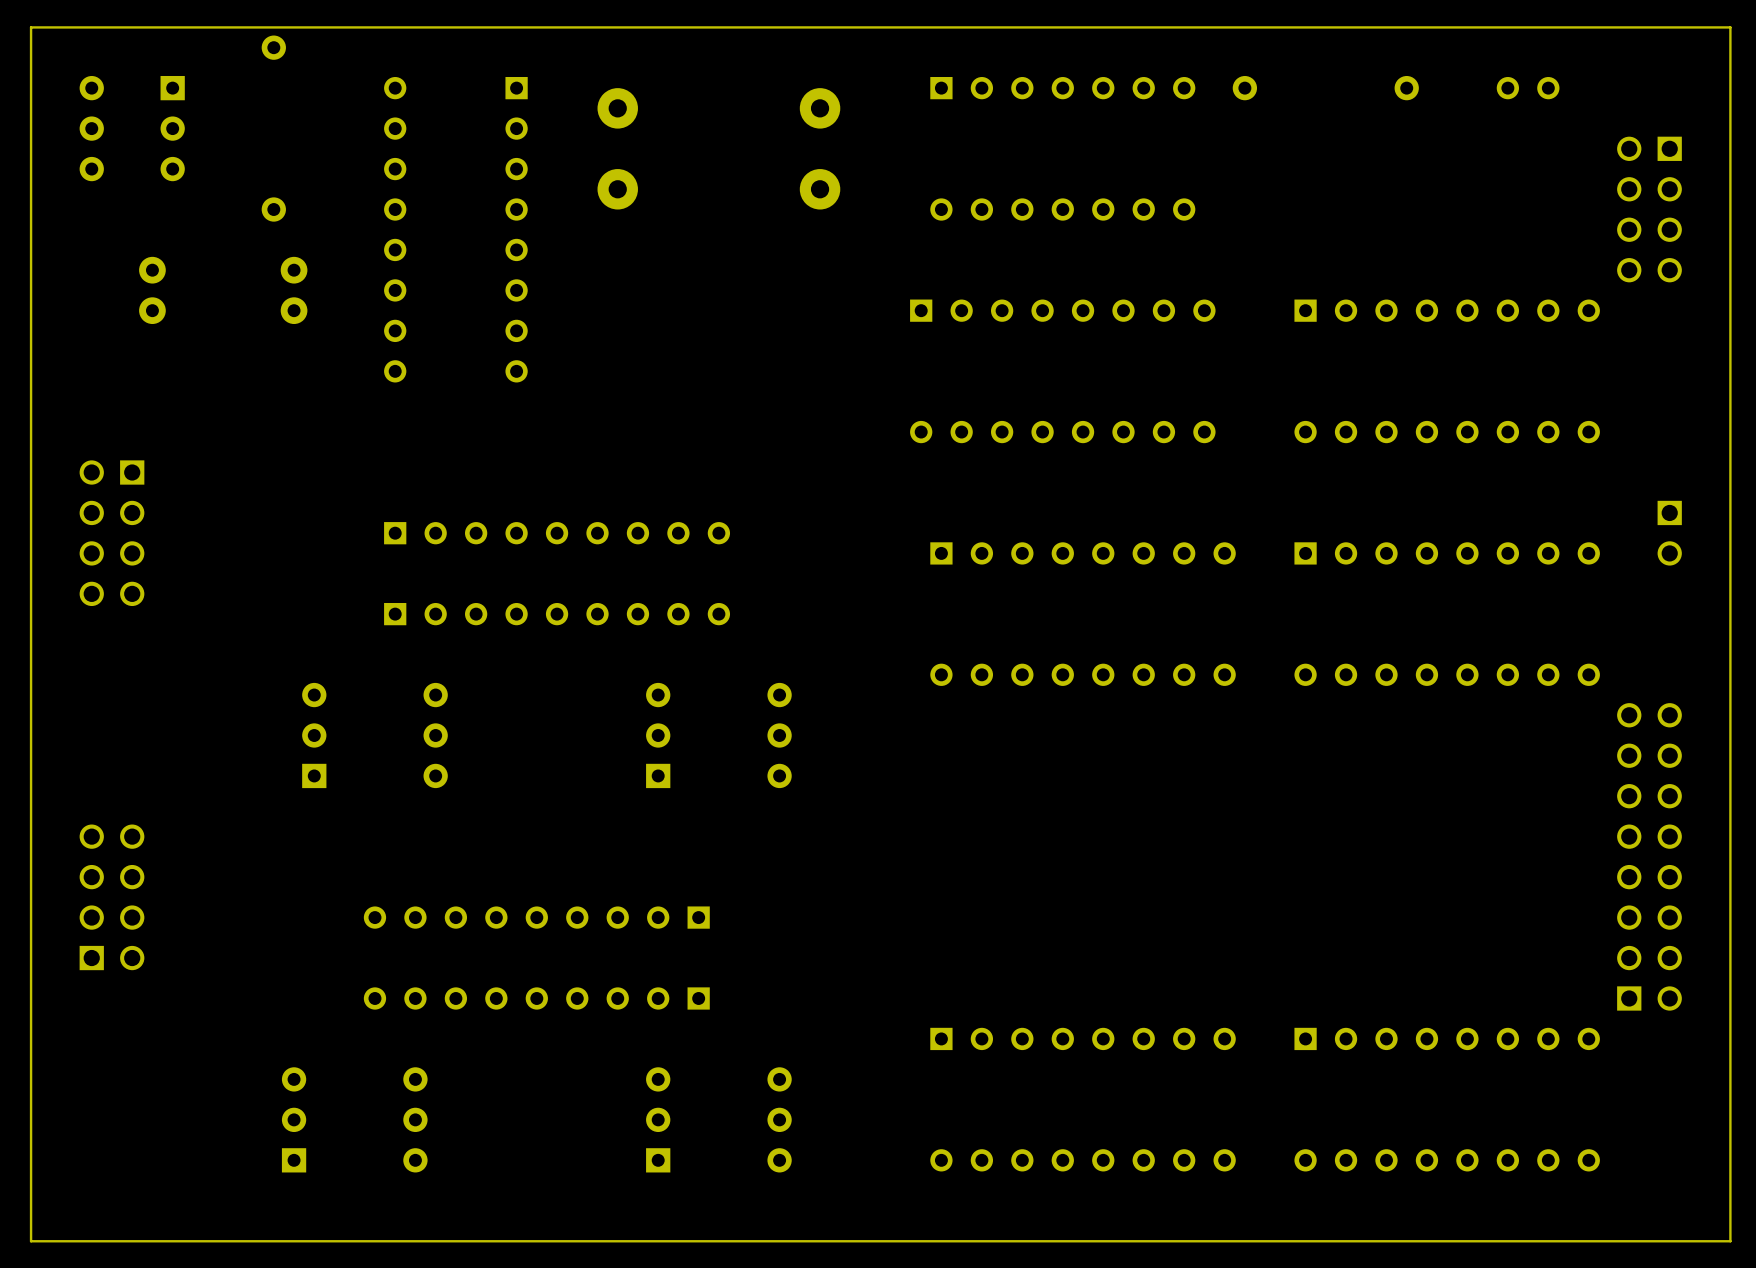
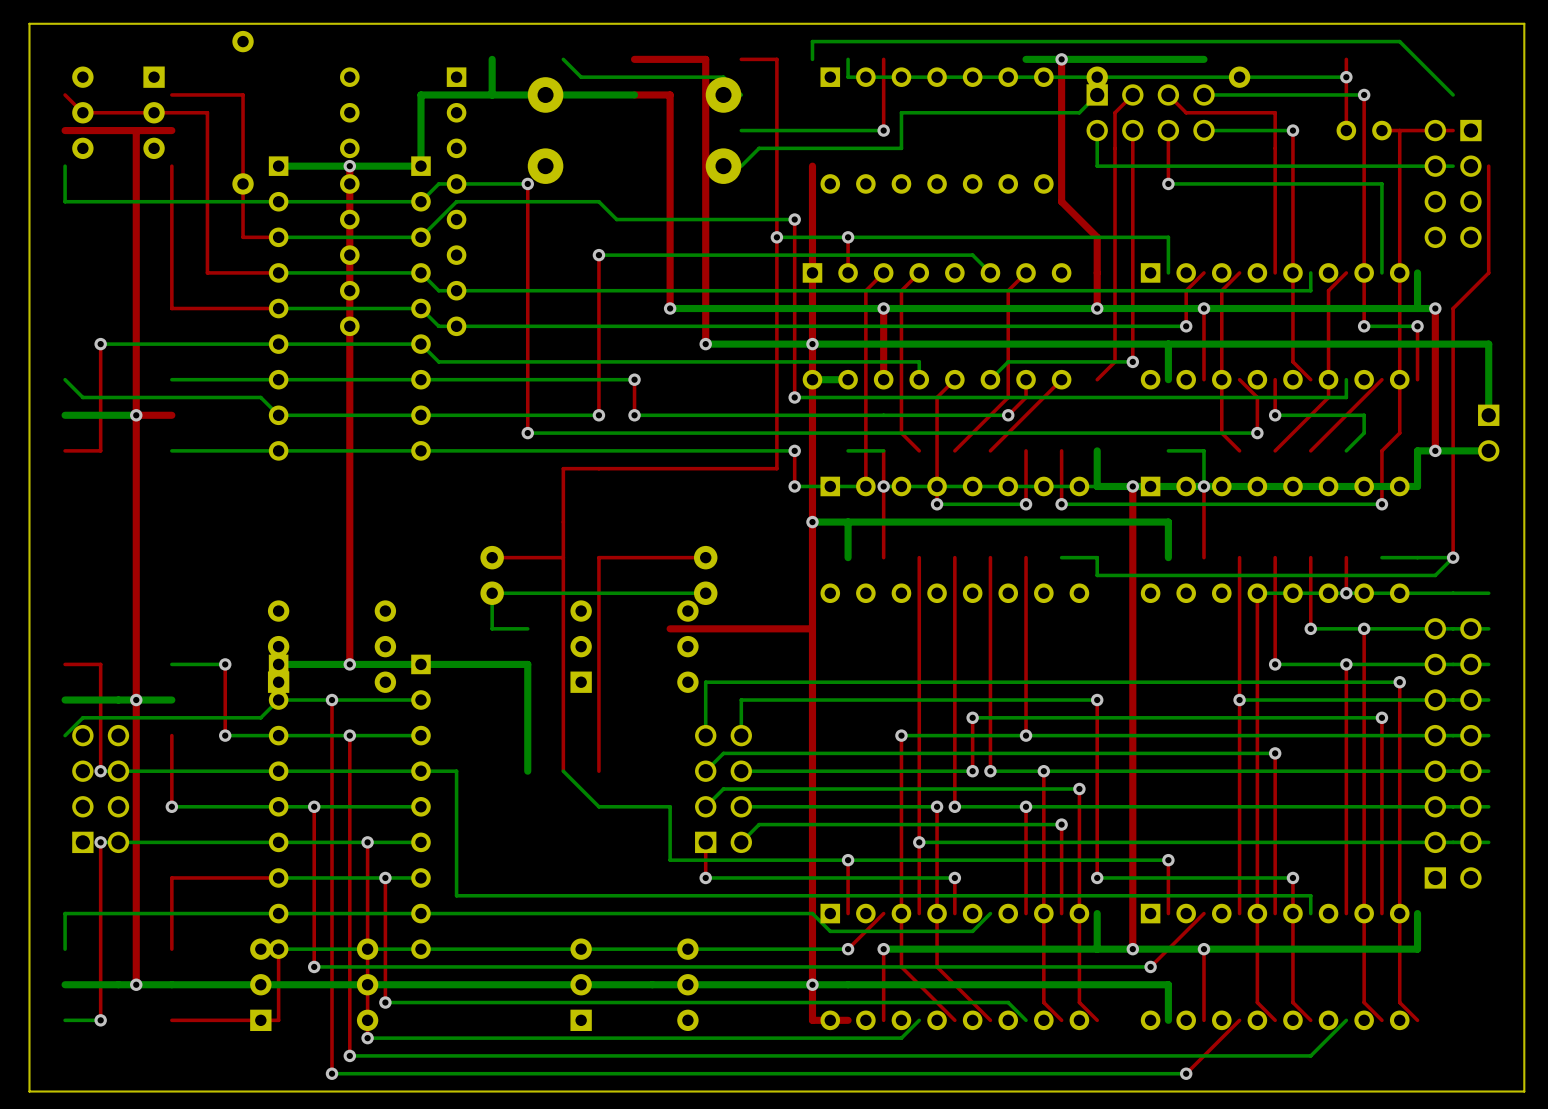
bottom track: none -> (492, 59) (492, 94)
bottom track: none -> (563, 59) (581, 77) (723, 77) (741, 94)
top track: none -> (634, 59) (705, 59) (705, 344)
top track: none -> (741, 59) (776, 59) (776, 468) (563, 468) (563, 771)
bottom track: none -> (812, 59) (812, 41) (1399, 41) (1453, 94)
bottom track: none -> (848, 59) (848, 77) (1346, 77)
top track: none -> (883, 59) (883, 130)
top track: none -> (1061, 59) (1061, 201) (1097, 237) (1097, 308)
via: none -> (1061, 59)
bottom track: none -> (1203, 59) (1026, 59)
top track: none -> (1346, 59) (1346, 130)
part position: (1528, 88) -> (1364, 130)
via: none -> (1346, 77)
top track: none -> (65, 94) (82, 112) (207, 112) (207, 272) (278, 272)
top track: none -> (171, 94) (243, 94) (243, 237) (278, 237)
top track: none -> (634, 94) (670, 94) (670, 308)
bottom track: none -> (634, 94) (420, 94) (420, 166) (278, 166)
bottom track: none -> (1097, 94) (1079, 112) (901, 112) (901, 148) (759, 148) (741, 166)
top track: none -> (1132, 94) (1115, 112) (1115, 361) (1097, 379)
top track: none -> (1168, 94) (1186, 112) (1275, 112) (1275, 272)
top track: none -> (1364, 94) (1364, 326)
bottom track: none -> (1364, 94) (1203, 94)
via: none -> (1364, 94)
part: none -> (1150, 112)
top track: none -> (136, 130) (136, 984)
top track: none -> (171, 130) (65, 130)
bottom track: none -> (883, 130) (741, 130)
via: none -> (883, 130)
bottom track: none -> (1097, 130) (1097, 166) (1453, 166)
top track: none -> (1132, 130) (1132, 361)
top track: none -> (1168, 130) (1168, 183)
top track: none -> (1292, 130) (1292, 361) (1310, 379)
bottom track: none -> (1292, 130) (1203, 130)
via: none -> (1292, 130)
top track: none -> (1399, 130) (1399, 433) (1381, 450) (1381, 504)
top track: none -> (1453, 130) (1381, 130)
bottom track: none -> (65, 166) (65, 201) (420, 201) (438, 183) (527, 183)
top track: none -> (171, 166) (171, 308) (278, 308)
top track: none -> (349, 166) (349, 664)
via: none -> (349, 166)
top track: none -> (812, 166) (812, 1020) (848, 1020)
top track: none -> (1488, 166) (1488, 272) (1453, 308) (1453, 557)
top track: none -> (527, 183) (527, 433)
via: none -> (527, 183)
bottom track: none -> (1168, 183) (1381, 183) (1381, 272)
via: none -> (1168, 183)
top track: none -> (794, 219) (794, 397)
bottom track: none -> (794, 219) (616, 219) (598, 201) (456, 201) (420, 237) (278, 237)
via: none -> (794, 219)
bottom track: none -> (776, 237) (1168, 237) (1168, 272)
via: none -> (776, 237)
top track: none -> (848, 237) (848, 272)
via: none -> (848, 237)
part: (152, 290) -> none
part: (294, 290) -> none
top track: none -> (598, 255) (598, 415)
bottom track: none -> (598, 255) (972, 255) (990, 272)
via: none -> (598, 255)
top track: none -> (883, 272) (865, 290) (865, 486)
top track: none -> (919, 272) (901, 290) (901, 433) (919, 450)
top track: none -> (1026, 272) (1008, 290) (1008, 397) (954, 450)
top track: none -> (1203, 272) (1186, 290) (1186, 326)
top track: none -> (1239, 272) (1221, 290) (1221, 433) (1239, 450)
bottom track: none -> (1310, 272) (1310, 290) (438, 290) (420, 272) (278, 272)
top track: none -> (1346, 272) (1328, 290) (1328, 397) (1275, 450)
bottom track: none -> (1417, 272) (1417, 308)
bottom track: none -> (278, 308) (420, 308) (438, 326) (1186, 326)
part: none -> (278, 308)
part: none -> (420, 308)
via: none -> (670, 308)
top track: none -> (883, 308) (883, 379)
via: none -> (883, 308)
via: none -> (1097, 308)
top track: none -> (1203, 308) (1203, 379)
via: none -> (1203, 308)
top track: none -> (1435, 308) (1435, 450)
bottom track: none -> (1435, 308) (670, 308)
via: none -> (1435, 308)
via: none -> (1186, 326)
via: none -> (1364, 326)
top track: none -> (1417, 326) (1417, 379)
bottom track: none -> (1417, 326) (1364, 326)
via: none -> (1417, 326)
top track: none -> (100, 344) (100, 450) (65, 450)
bottom track: none -> (100, 344) (420, 344) (438, 361) (919, 361) (919, 379)
via: none -> (100, 344)
bottom track: none -> (705, 344) (1488, 344) (1488, 415)
via: none -> (705, 344)
via: none -> (812, 344)
bottom track: none -> (1168, 344) (1168, 379)
bottom track: none -> (1132, 361) (1008, 361) (990, 379)
via: none -> (1132, 361)
bottom track: none -> (65, 379) (82, 397) (260, 397) (278, 415) (598, 415)
top track: none -> (634, 379) (634, 415)
bottom track: none -> (634, 379) (171, 379)
via: none -> (634, 379)
bottom track: none -> (848, 379) (812, 379)
top track: none -> (954, 379) (937, 397) (937, 504)
top track: none -> (1026, 379) (1026, 397) (1008, 415)
top track: none -> (1061, 379) (990, 450)
top track: none -> (1239, 379) (1257, 397) (1257, 433)
top track: none -> (1275, 379) (1275, 415)
bottom track: none -> (1346, 379) (1346, 397) (794, 397)
top track: none -> (1381, 379) (1310, 450)
via: none -> (794, 397)
bottom track: none -> (136, 415) (65, 415)
via: none -> (136, 415)
top track: none -> (171, 415) (136, 415)
via: none -> (598, 415)
via: none -> (634, 415)
bottom track: none -> (1008, 415) (634, 415)
via: none -> (1008, 415)
bottom track: none -> (1275, 415) (1364, 415) (1364, 433) (1346, 450)
via: none -> (1275, 415)
via: none -> (527, 433)
bottom track: none -> (1257, 433) (527, 433)
via: none -> (1257, 433)
top track: none -> (794, 450) (794, 486)
bottom track: none -> (794, 450) (171, 450)
via: none -> (794, 450)
top track: none -> (883, 450) (883, 557)
bottom track: none -> (883, 450) (848, 450)
top track: none -> (1026, 450) (1026, 504)
top track: none -> (1061, 450) (1061, 504)
bottom track: none -> (1097, 450) (1097, 486)
bottom track: none -> (1168, 450) (1203, 450) (1203, 486)
via: none -> (1435, 450)
bottom track: none -> (1488, 450) (1417, 450) (1417, 486) (1097, 486)
part: (111, 533) -> none
part: (557, 533) -> none
part position: (1669, 533) -> (1488, 433)
via: none -> (794, 486)
bottom track: none -> (865, 486) (794, 486)
via: none -> (883, 486)
bottom track: none -> (1097, 486) (883, 486)
top track: none -> (1132, 486) (1132, 949)
via: none -> (1132, 486)
top track: none -> (1203, 486) (1203, 557)
via: none -> (1203, 486)
via: none -> (937, 504)
bottom track: none -> (1026, 504) (937, 504)
via: none -> (1026, 504)
via: none -> (1061, 504)
bottom track: none -> (1381, 504) (1061, 504)
via: none -> (1381, 504)
bottom track: none -> (812, 522) (1168, 522) (1168, 557)
via: none -> (812, 522)
bottom track: none -> (848, 522) (848, 557)
part: (557, 614) -> none
top track: none -> (563, 557) (492, 557)
top track: none -> (705, 557) (598, 557) (598, 771)
top track: none -> (919, 557) (919, 913)
top track: none -> (954, 557) (954, 806)
top track: none -> (990, 557) (990, 771)
top track: none -> (1026, 557) (1026, 735)
top track: none -> (1239, 557) (1239, 913)
top track: none -> (1275, 557) (1275, 664)
top track: none -> (1310, 557) (1310, 628)
top track: none -> (1346, 557) (1346, 593)
bottom track: none -> (1381, 557) (1453, 557) (1435, 575) (1097, 575) (1097, 557) (1061, 557)
via: none -> (1453, 557)
part: none -> (492, 575)
part: none -> (705, 575)
bottom track: none -> (705, 593) (492, 593) (492, 628) (527, 628)
top track: none -> (1257, 593) (1257, 1002) (1275, 1020)
via: none -> (1346, 593)
bottom track: none -> (1488, 593) (1257, 593)
top track: none -> (812, 628) (670, 628)
via: none -> (1310, 628)
top track: none -> (1364, 628) (1364, 1002) (1381, 1020)
via: none -> (1364, 628)
bottom track: none -> (1488, 628) (1310, 628)
top track: none -> (65, 664) (100, 664) (100, 771)
top track: none -> (225, 664) (225, 735)
bottom track: none -> (225, 664) (171, 664)
via: none -> (225, 664)
bottom track: none -> (278, 664) (527, 664) (527, 771)
via: none -> (349, 664)
via: none -> (1275, 664)
top track: none -> (1346, 664) (1346, 913)
via: none -> (1346, 664)
bottom track: none -> (1488, 664) (1275, 664)
top track: none -> (1399, 682) (1399, 1002) (1417, 1020)
bottom track: none -> (1399, 682) (705, 682) (705, 735)
via: none -> (1399, 682)
via: none -> (136, 700)
bottom track: none -> (171, 700) (65, 700)
top track: none -> (332, 700) (332, 1073)
via: none -> (332, 700)
bottom track: none -> (420, 700) (278, 700) (260, 717) (82, 717) (65, 735)
top track: none -> (1097, 700) (1097, 877)
bottom track: none -> (1097, 700) (741, 700) (741, 735)
via: none -> (1097, 700)
via: none -> (1239, 700)
bottom track: none -> (1488, 700) (1239, 700)
top track: none -> (972, 717) (972, 771)
via: none -> (972, 717)
top track: none -> (1381, 717) (1381, 913)
bottom track: none -> (1381, 717) (972, 717)
via: none -> (1381, 717)
top track: none -> (171, 735) (171, 806)
via: none -> (225, 735)
top track: none -> (349, 735) (349, 1055)
via: none -> (349, 735)
bottom track: none -> (420, 735) (225, 735)
top track: none -> (901, 735) (901, 966) (954, 1020)
via: none -> (901, 735)
via: none -> (1026, 735)
bottom track: none -> (1488, 735) (901, 735)
top track: none -> (1275, 753) (1275, 913)
bottom track: none -> (1275, 753) (723, 753) (705, 771)
via: none -> (1275, 753)
bottom track: none -> (100, 771) (456, 771) (456, 895) (1310, 895) (1310, 913)
via: none -> (100, 771)
bottom track: none -> (563, 771) (598, 806) (670, 806) (670, 860) (1168, 860)
bottom track: none -> (972, 771) (741, 771)
via: none -> (972, 771)
via: none -> (990, 771)
top track: none -> (1043, 771) (1043, 1002) (1061, 1020)
via: none -> (1043, 771)
bottom track: none -> (1488, 771) (990, 771)
part: none -> (723, 788)
top track: none -> (1079, 788) (1079, 1002) (1097, 1020)
bottom track: none -> (1079, 788) (723, 788) (705, 806)
via: none -> (1079, 788)
via: none -> (171, 806)
part: none -> (278, 806)
top track: none -> (314, 806) (314, 966)
via: none -> (314, 806)
bottom track: none -> (420, 806) (171, 806)
part: none -> (420, 806)
part: (536, 917) -> none
top track: none -> (937, 806) (937, 966) (990, 1020)
bottom track: none -> (937, 806) (741, 806)
via: none -> (937, 806)
via: none -> (954, 806)
top track: none -> (1026, 806) (1026, 913)
via: none -> (1026, 806)
bottom track: none -> (1488, 806) (954, 806)
top track: none -> (1061, 824) (1061, 913)
bottom track: none -> (1061, 824) (759, 824) (741, 842)
via: none -> (1061, 824)
top track: none -> (100, 842) (100, 1020)
via: none -> (100, 842)
top track: none -> (367, 842) (367, 1038)
via: none -> (367, 842)
bottom track: none -> (420, 842) (100, 842)
top track: none -> (705, 842) (705, 877)
via: none -> (919, 842)
bottom track: none -> (1488, 842) (919, 842)
top track: none -> (848, 860) (848, 913)
via: none -> (848, 860)
top track: none -> (1168, 860) (1168, 913)
via: none -> (1168, 860)
top track: none -> (278, 877) (171, 877) (171, 949)
top track: none -> (385, 877) (385, 1002)
via: none -> (385, 877)
bottom track: none -> (420, 877) (278, 877)
part: (536, 998) -> none
via: none -> (705, 877)
top track: none -> (954, 877) (954, 913)
bottom track: none -> (954, 877) (705, 877)
via: none -> (954, 877)
via: none -> (1097, 877)
top track: none -> (1292, 877) (1292, 1002) (1310, 1020)
bottom track: none -> (1292, 877) (1097, 877)
via: none -> (1292, 877)
top track: none -> (883, 913) (848, 949)
bottom track: none -> (990, 913) (972, 931) (830, 931) (812, 913) (65, 913) (65, 949)
bottom track: none -> (1097, 913) (1097, 949)
top track: none -> (1203, 913) (1150, 966)
bottom track: none -> (1417, 913) (1417, 949) (883, 949)
top track: none -> (278, 949) (278, 1020) (171, 1020)
bottom track: none -> (848, 949) (278, 949)
via: none -> (848, 949)
top track: none -> (883, 949) (883, 1020)
via: none -> (883, 949)
via: none -> (1132, 949)
top track: none -> (1203, 949) (1203, 1020)
via: none -> (1203, 949)
via: none -> (314, 966)
bottom track: none -> (1150, 966) (314, 966)
via: none -> (1150, 966)
bottom track: none -> (65, 984) (1168, 984) (1168, 1020)
via: none -> (136, 984)
via: none -> (812, 984)
bottom track: none -> (385, 1002) (1008, 1002) (1026, 1020)
via: none -> (385, 1002)
bottom track: none -> (100, 1020) (65, 1020)
via: none -> (100, 1020)
bottom track: none -> (919, 1020) (901, 1038) (367, 1038)
top track: none -> (1239, 1020) (1186, 1073)
bottom track: none -> (1346, 1020) (1310, 1055) (349, 1055)
via: none -> (367, 1038)
via: none -> (349, 1055)
via: none -> (332, 1073)
bottom track: none -> (1186, 1073) (332, 1073)
via: none -> (1186, 1073)

